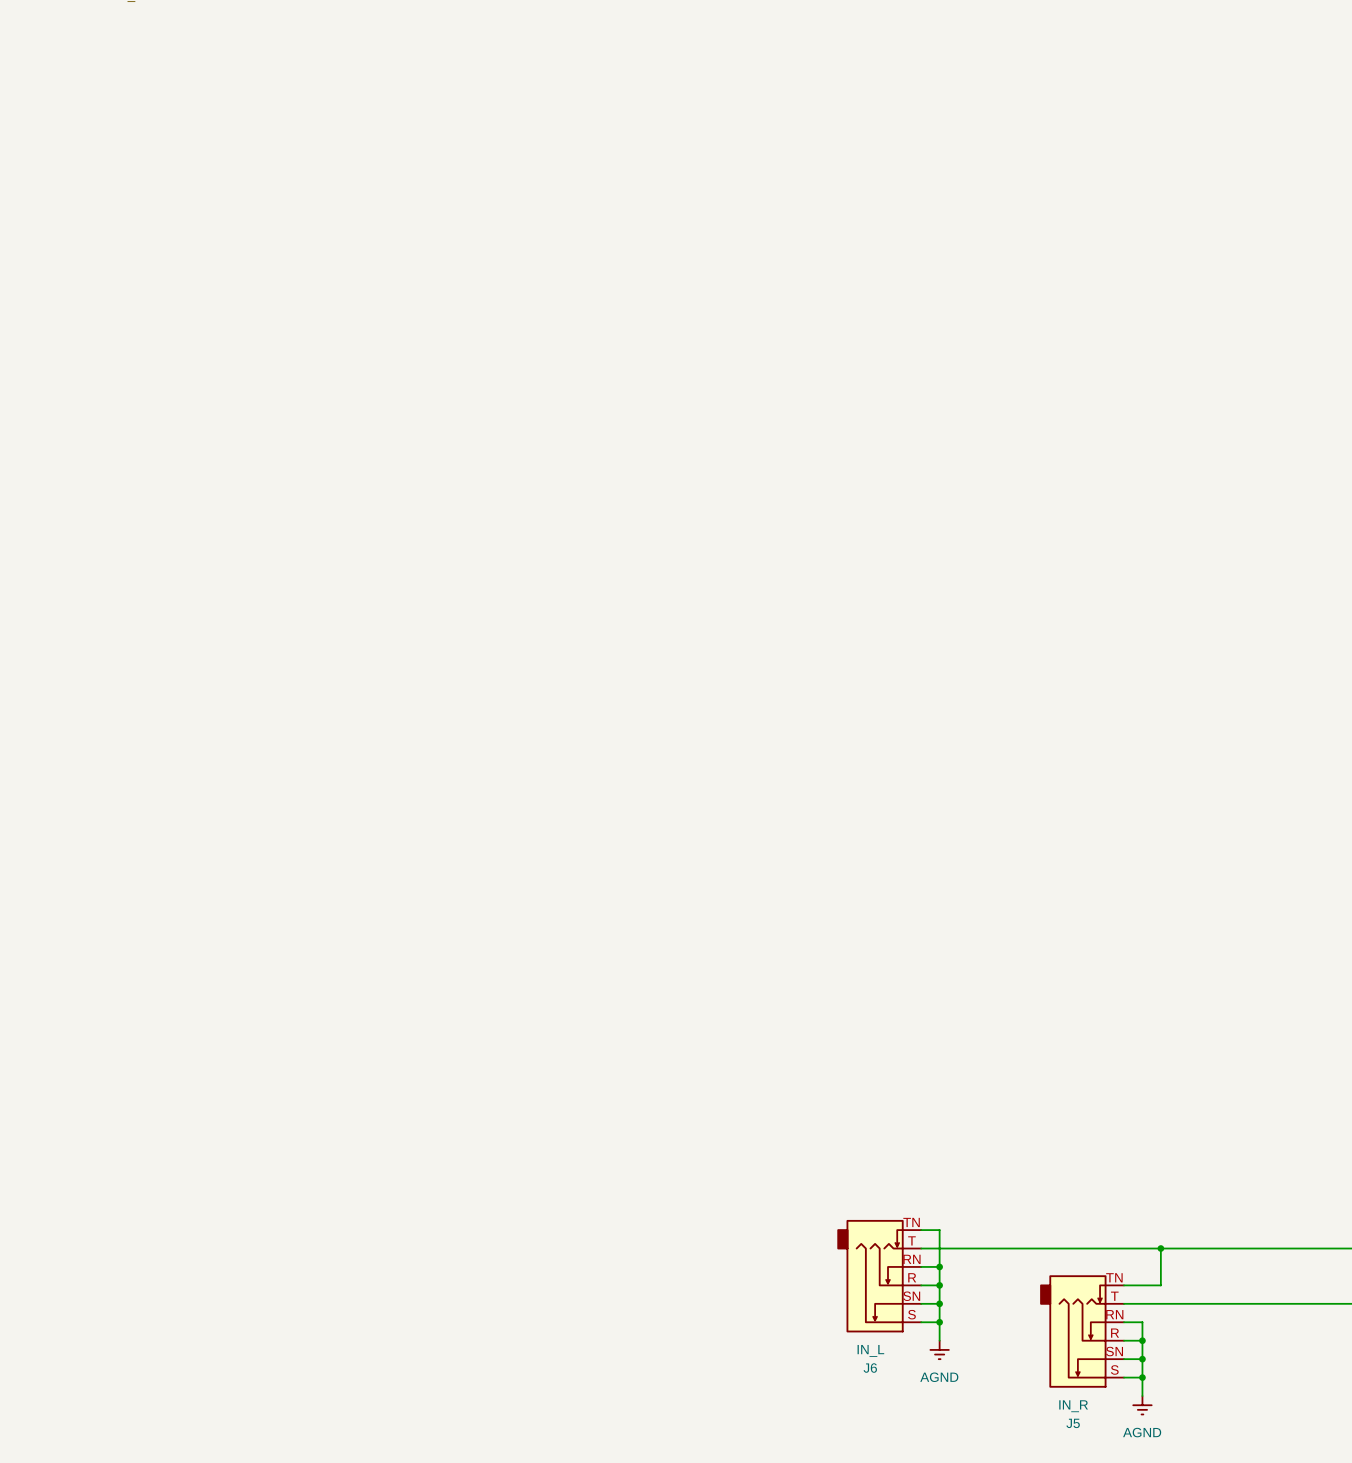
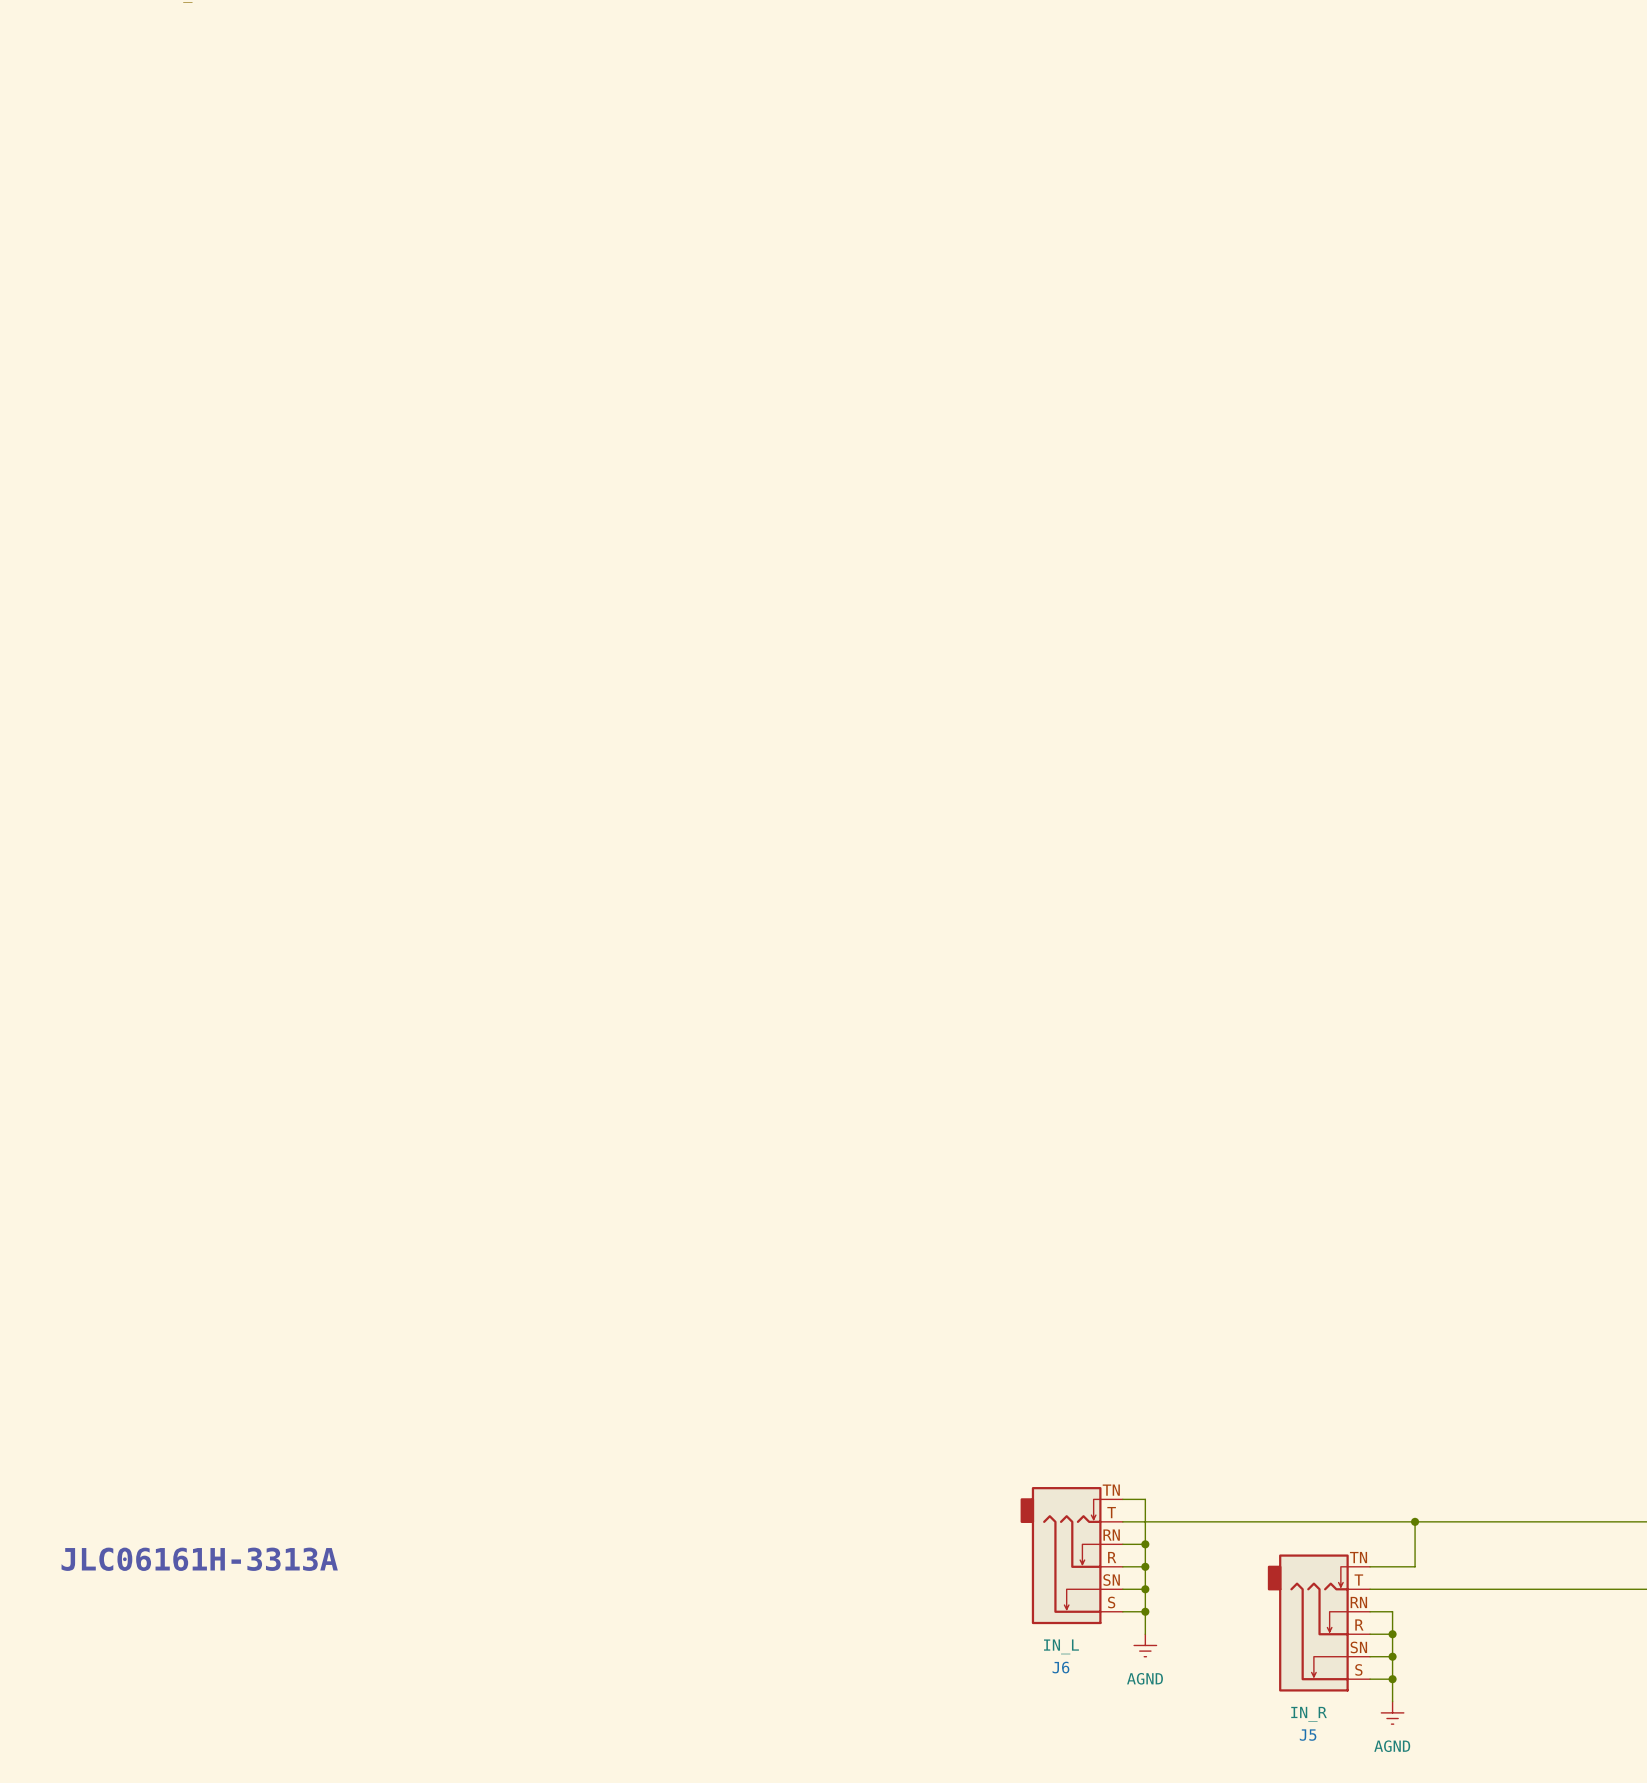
text: none -> JLC06161H-3313A (199, 1559)

